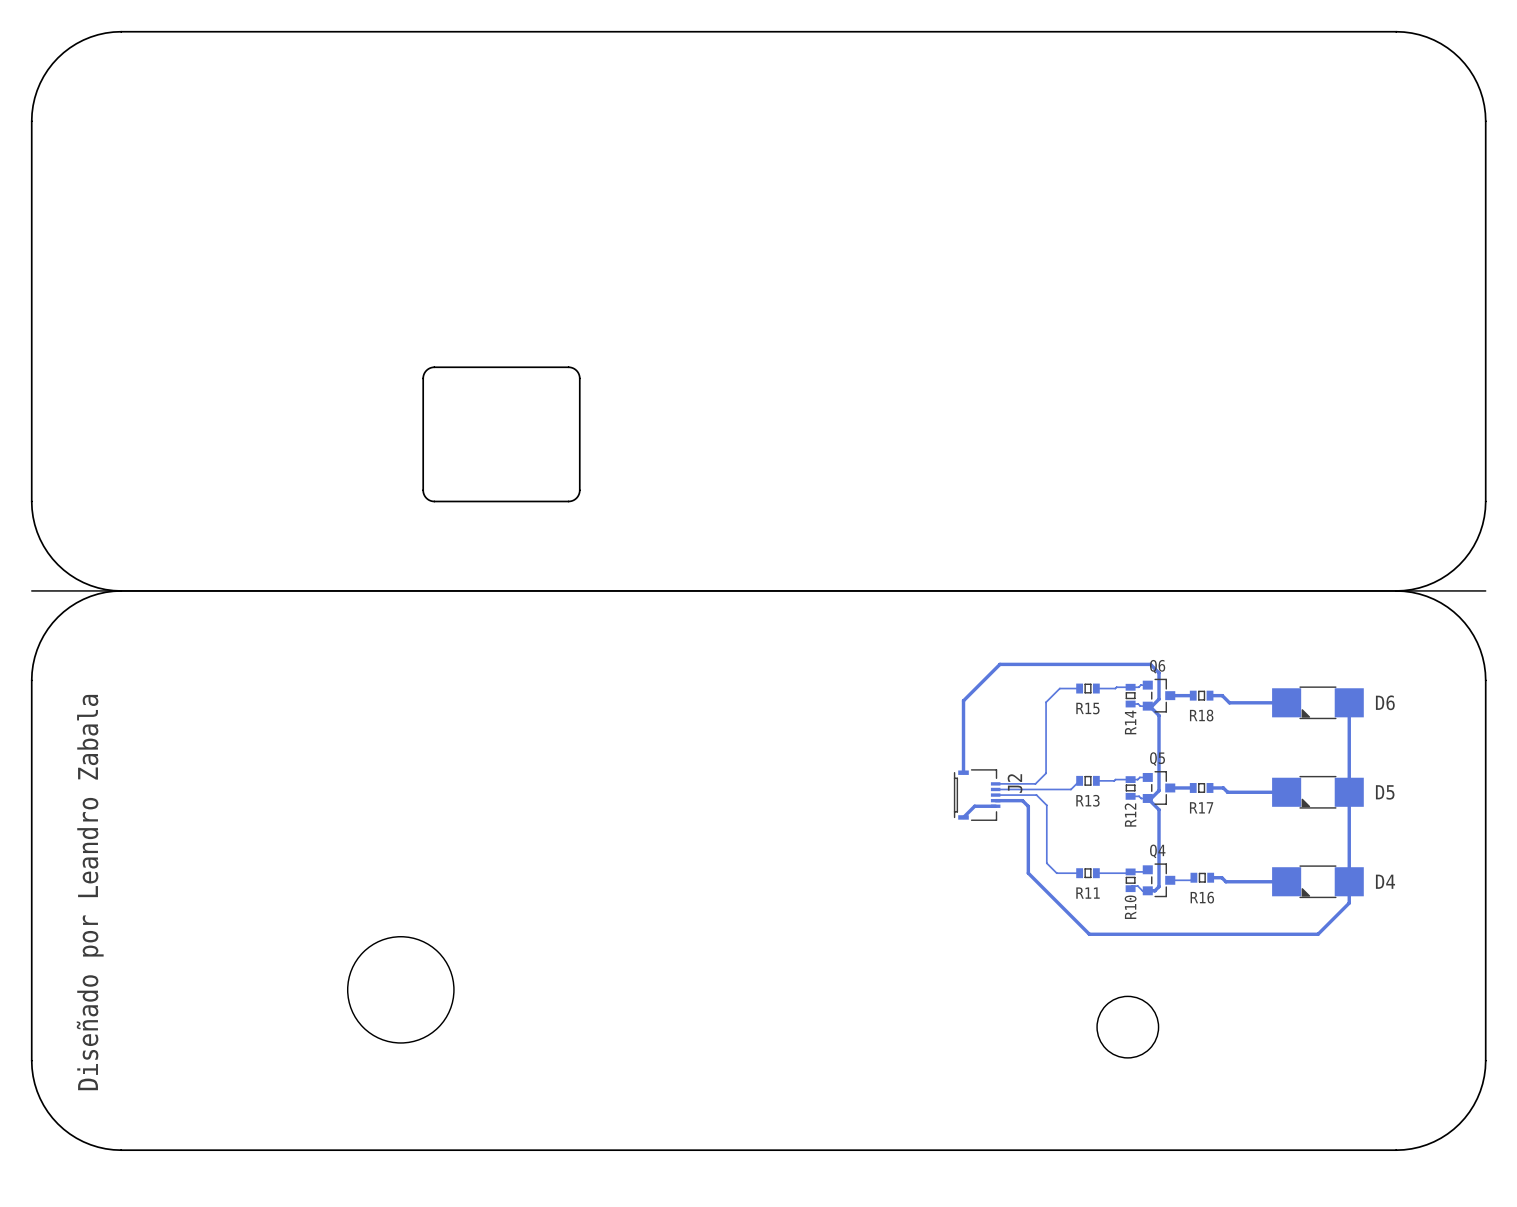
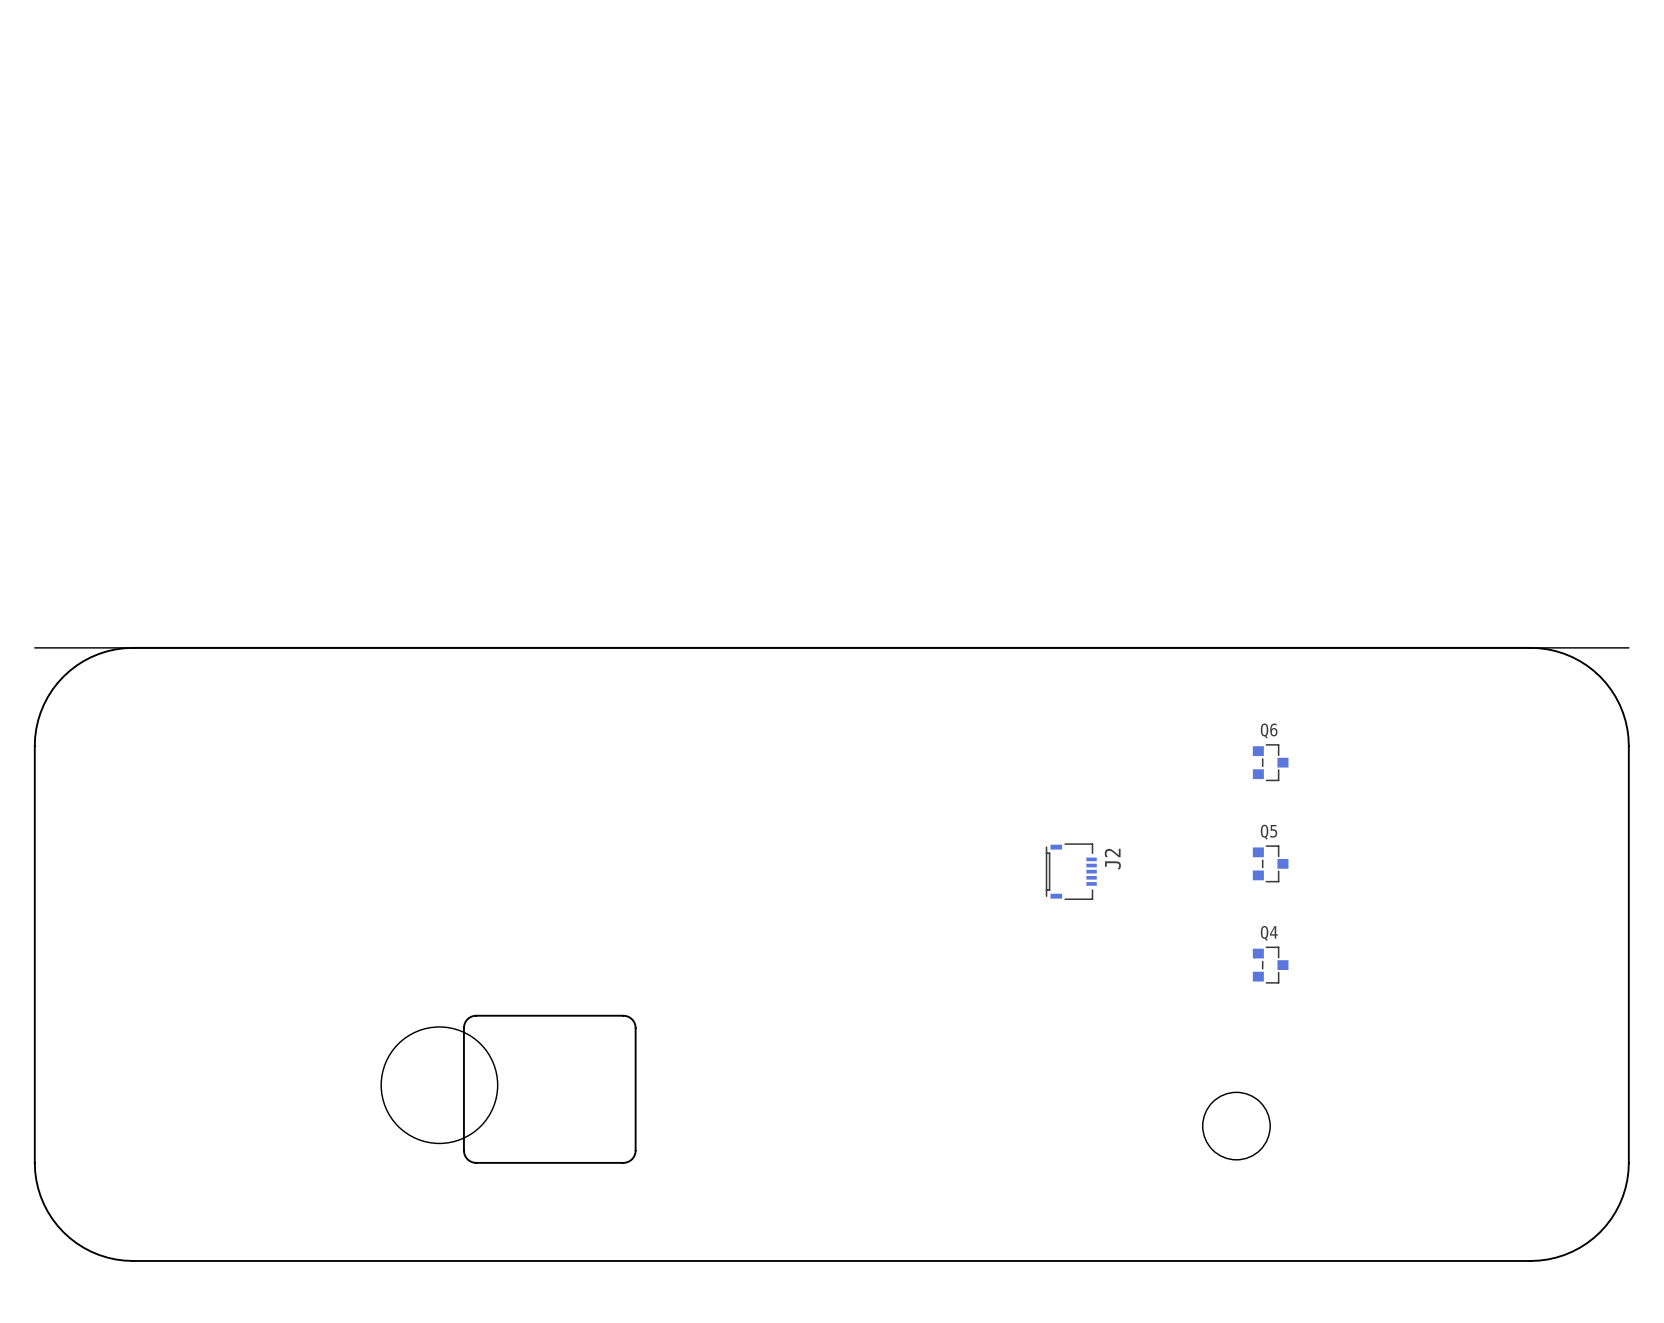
board edge: (568, 367) (434, 367) (426, 370) (423, 378) (423, 490) (426, 498) (434, 501) (568, 501) (576, 498) (579, 490) (579, 378) (576, 370) (568, 367) -> none
board edge: (1396, 590) (1411, 589) (1434, 582) (1459, 564) (1477, 539) (1484, 517) (1485, 501) (1484, 105) (1473, 76) (1453, 52) (1426, 37) (1396, 31) (121, 31) (105, 33) (83, 40) (63, 52) (47, 69) (37, 90) (32, 113) (32, 509) (40, 539) (57, 564) (83, 582) (105, 589) (121, 590) -> none
track: (1147, 685) (1140, 685) (1138, 687) (1096, 688) -> none
track: (1079, 688) (1059, 688) (1046, 702) (1046, 773) (1035, 783) (995, 783) -> none
R15: (1087, 688) -> none
R14: (1130, 695) -> none
track: (1193, 695) (1170, 695) -> none
R18: (1201, 695) -> none
track: (1210, 695) (1222, 695) (1229, 702) (1286, 702) -> none
D6: (1317, 702) -> none
track: (1349, 702) (1349, 903) (1318, 934) (1089, 934) (1028, 873) (1028, 806) (1022, 800) (995, 800) -> none
track: (1130, 704) (1152, 706) (1159, 699) (1159, 672) (1150, 664) (999, 664) (963, 700) (963, 772) -> none
track: (1149, 706) (1159, 715) (1159, 790) (1151, 798) (1147, 798) -> none
track: (1147, 777) (1096, 780) -> none
track: (1079, 780) (1071, 789) (995, 789) -> none
R13: (1087, 780) -> none
R12: (1130, 787) -> none
track: (1193, 787) (1170, 787) -> none
R17: (1201, 787) -> none
track: (1210, 787) (1223, 787) (1227, 792) (1286, 792) -> none
D5: (1317, 792) -> none
track: (995, 795) (1036, 795) (1046, 805) (1046, 863) (1056, 873) (1079, 873) -> none
track: (1130, 796) (1147, 798) -> none
track: (1147, 798) (1159, 809) (1159, 886) (1154, 890) (1142, 890) (1137, 886) (1132, 886) (1130, 888) -> none
track: (995, 806) (974, 806) (963, 817) -> none
track: (1147, 869) (1145, 871) (1129, 873) (1096, 873) -> none
R11: (1087, 873) -> none
track: (1193, 877) (1191, 880) (1170, 880) -> none
R16: (1202, 877) -> none
track: (1210, 877) (1221, 877) (1225, 881) (1286, 881) -> none
R10: (1130, 880) -> none
D4: (1317, 881) -> none
text: Diseñado por Leandro Zabala (90, 892) -> none
board edge: none -> (623, 1015) (476, 1015) (467, 1019) (463, 1028) (463, 1150) (467, 1159) (476, 1162) (623, 1162) (632, 1159) (635, 1150) (635, 1028) (632, 1019) (623, 1015)

